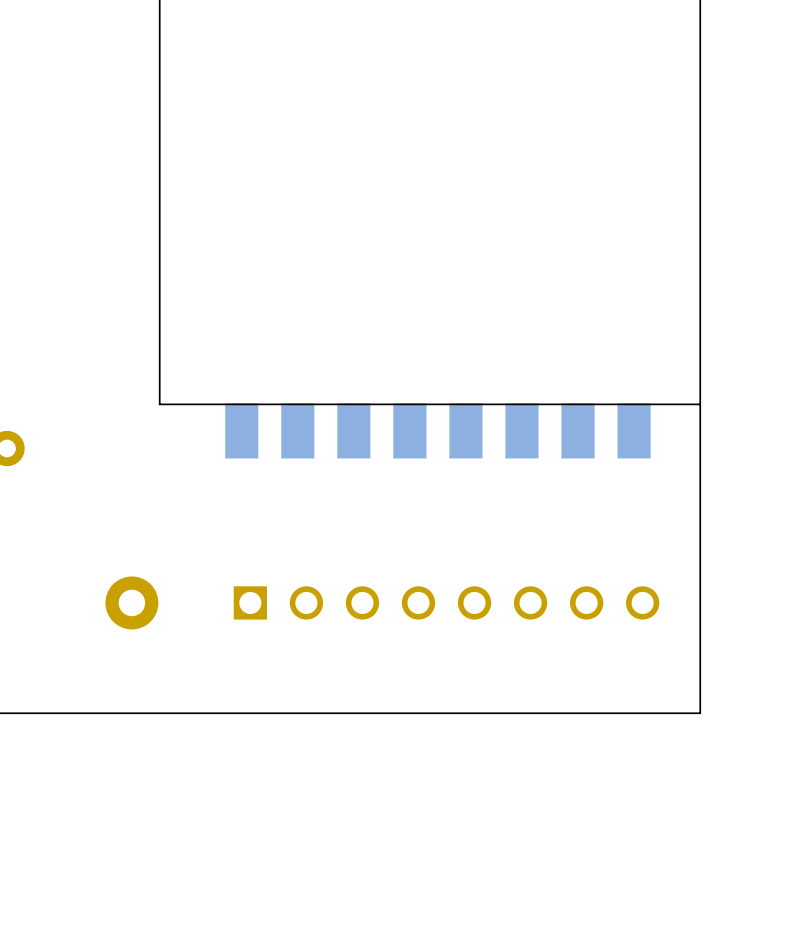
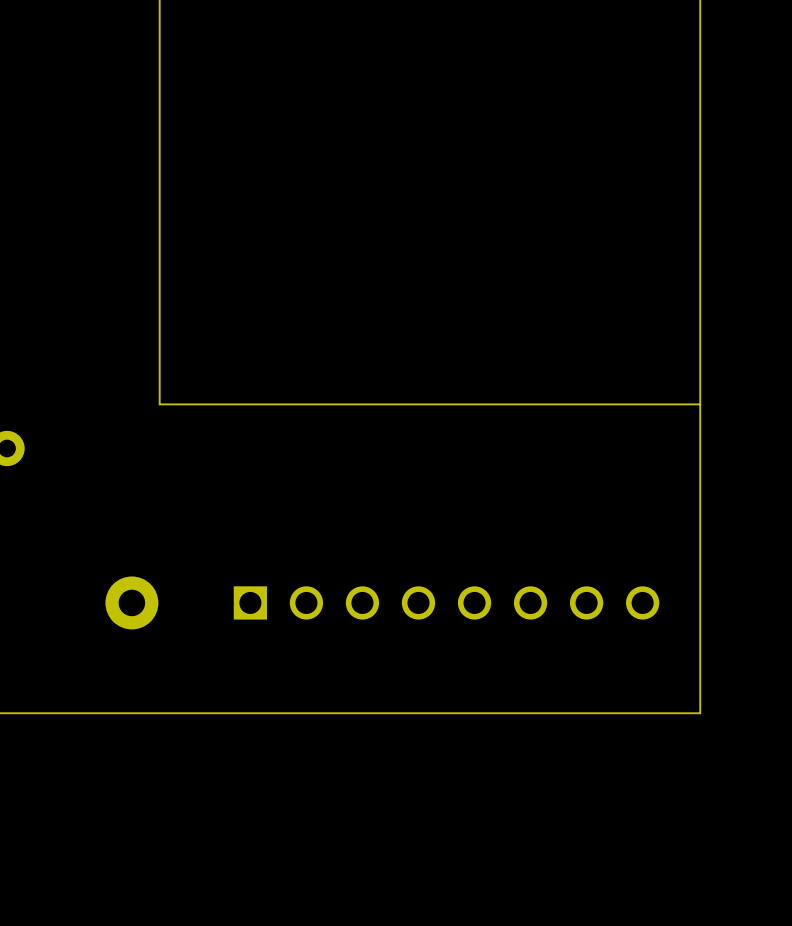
part: (241, 430) -> none
part: (297, 430) -> none
part: (353, 430) -> none
part: (409, 430) -> none
part: (465, 430) -> none
part: (521, 430) -> none
part: (578, 430) -> none
part: (634, 430) -> none

